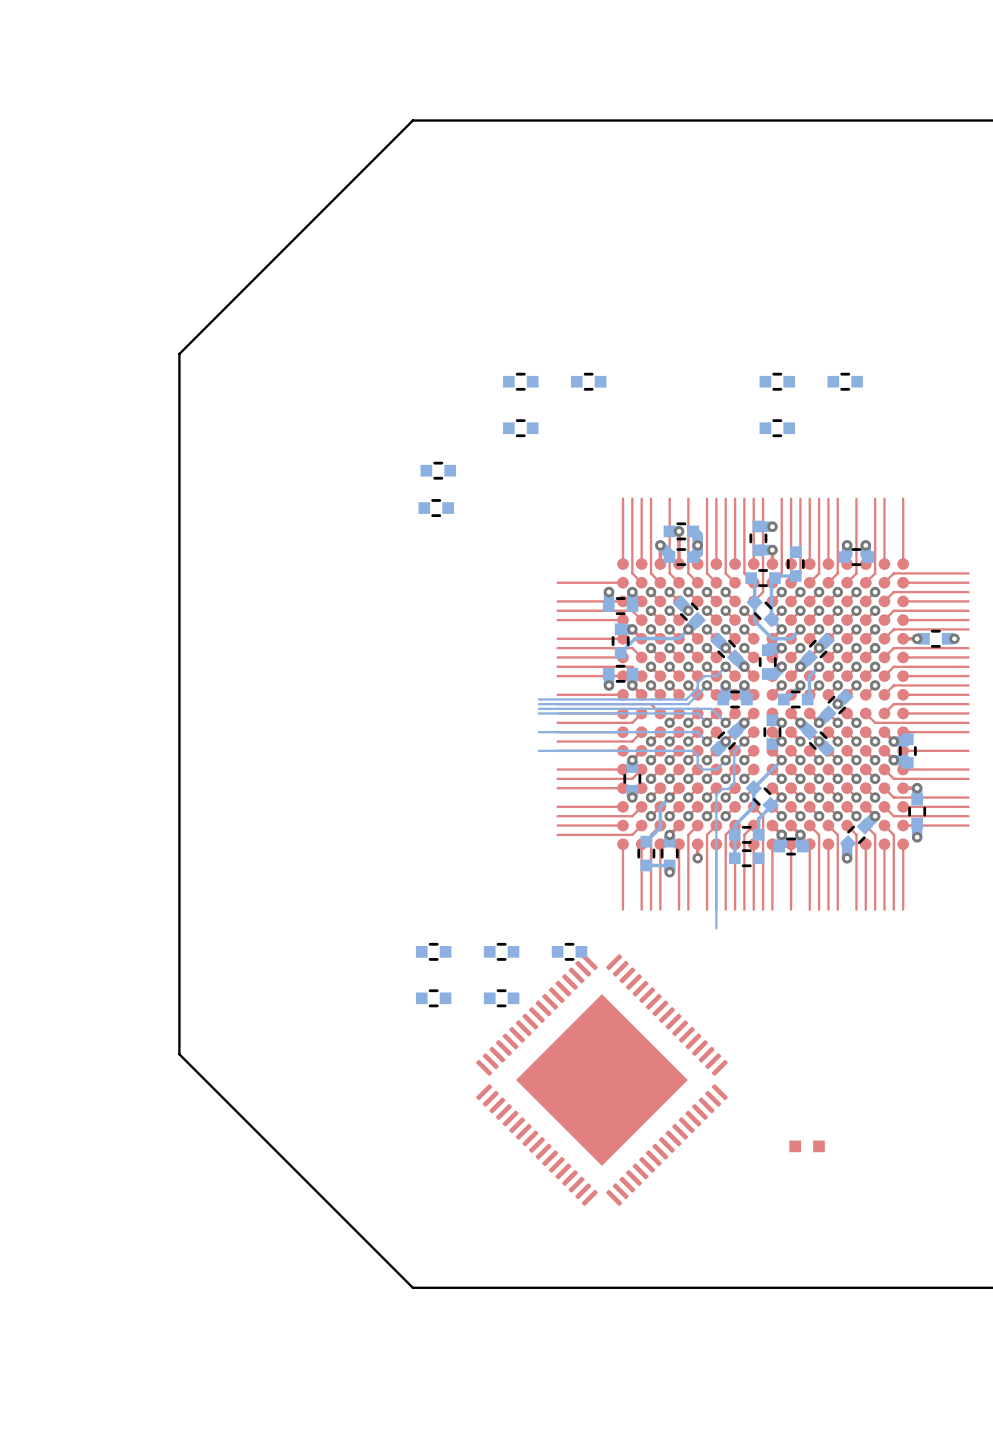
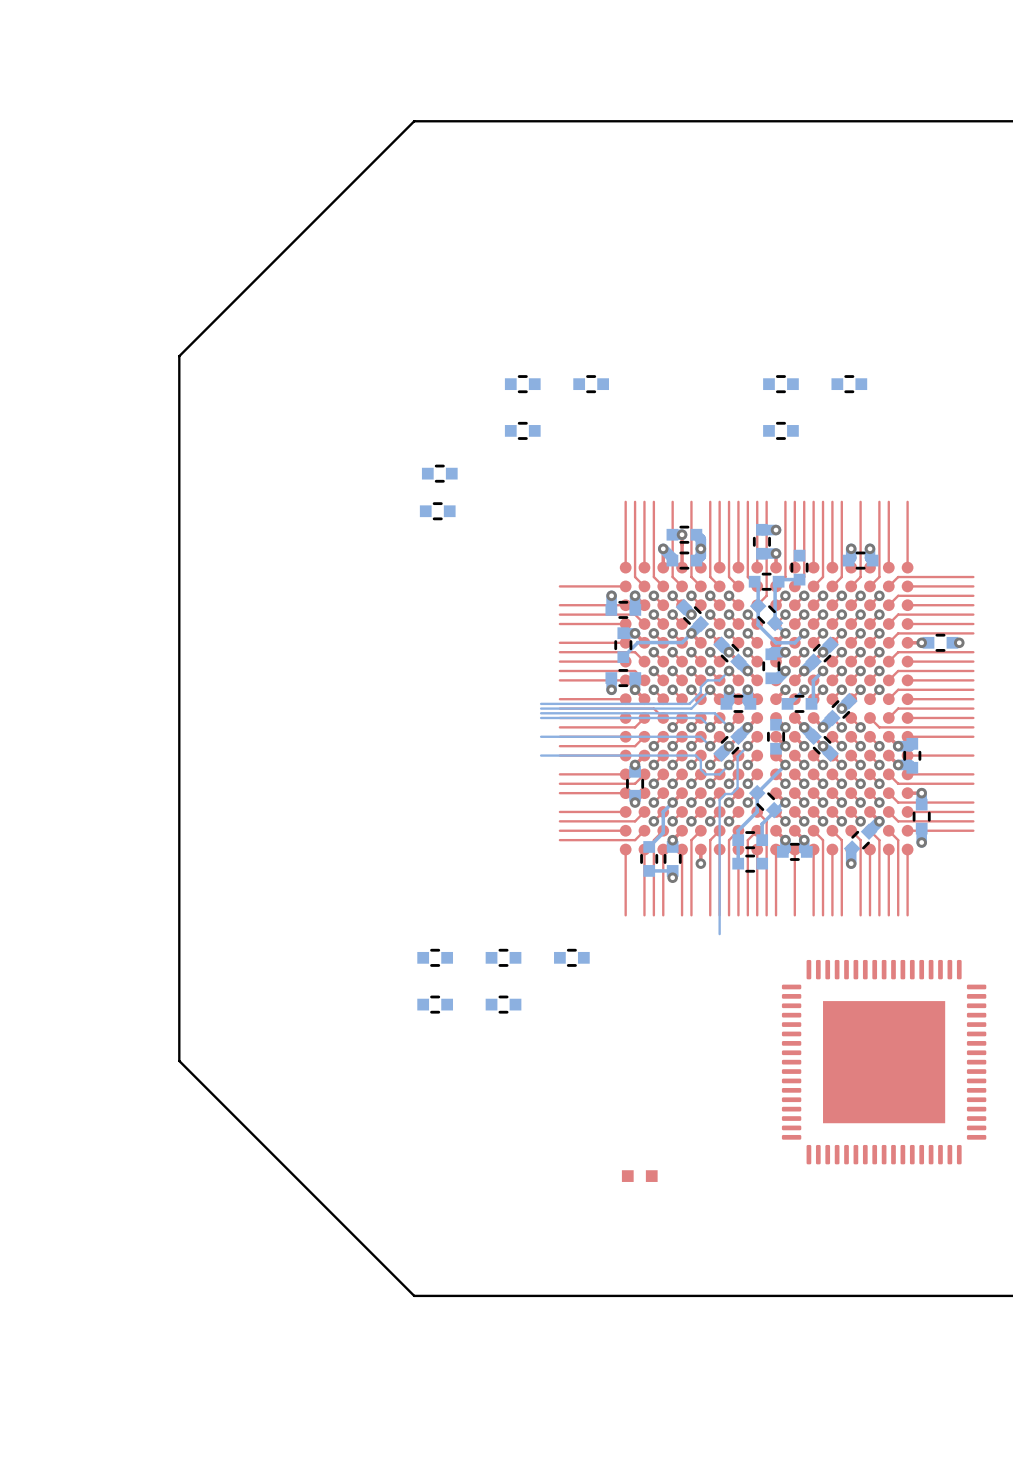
part: none -> (884, 1062)
part: (601, 1080) -> none
part position: (807, 1146) -> (639, 1176)

